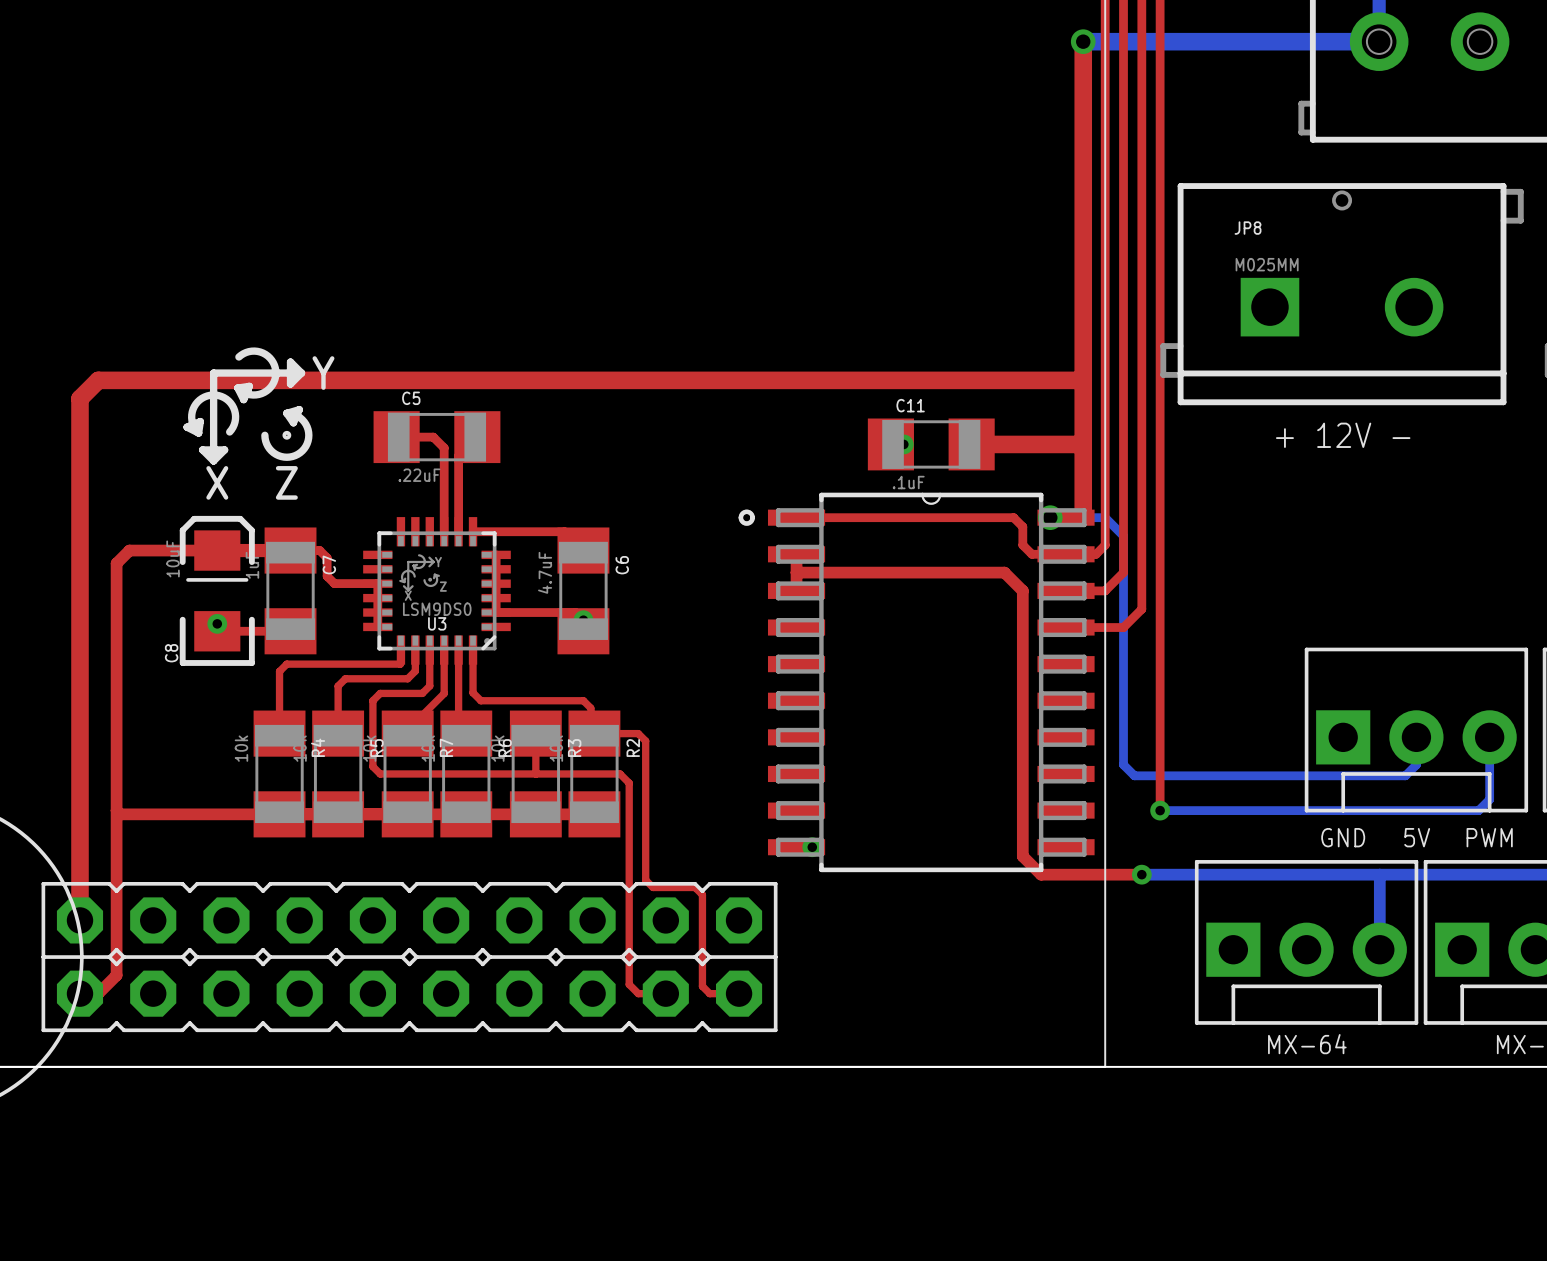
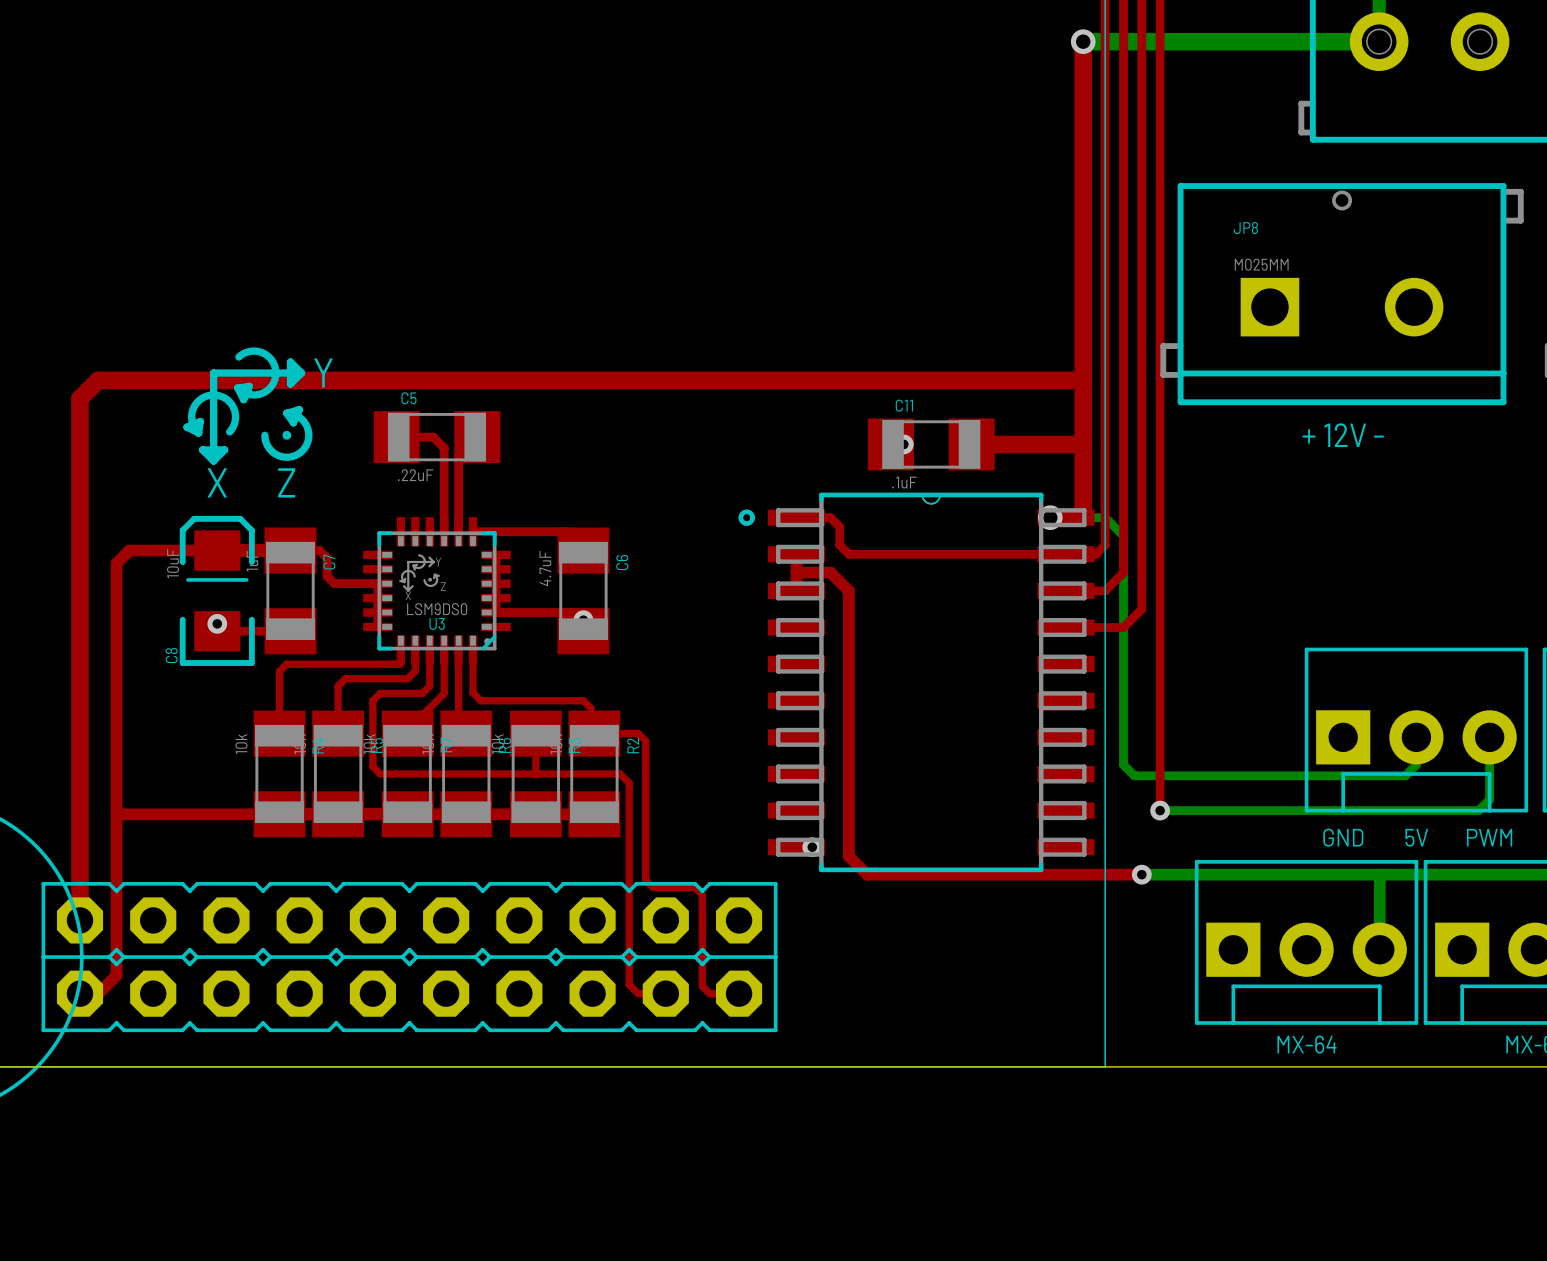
top track: (830, 517) (1013, 517) (1022, 526) (1022, 545) (1031, 554) -> (830, 517) (839, 526) (839, 545) (848, 554) (1031, 554)
top track: (830, 572) (1004, 572) (1022, 590) (1022, 856) (1041, 874) -> (830, 572) (848, 590) (848, 856) (867, 874) (1041, 874)

